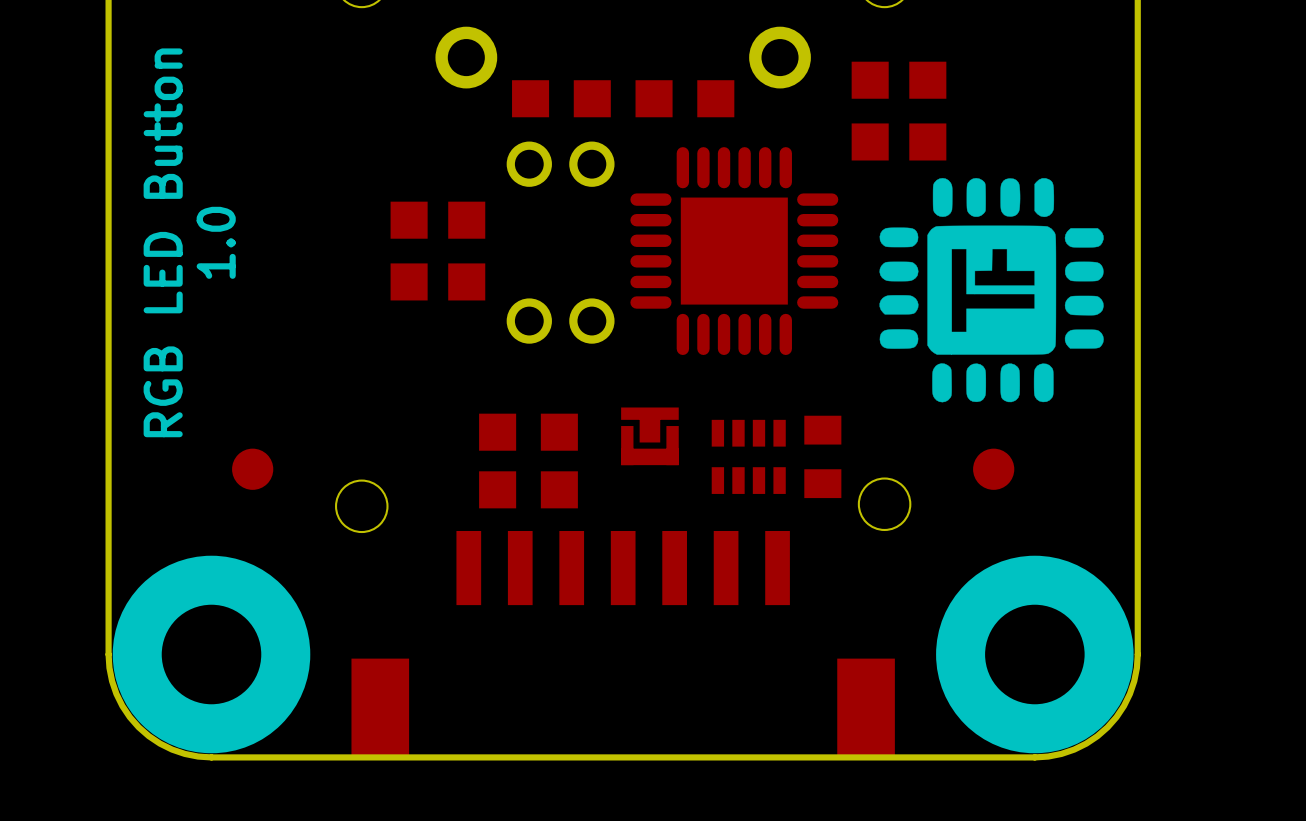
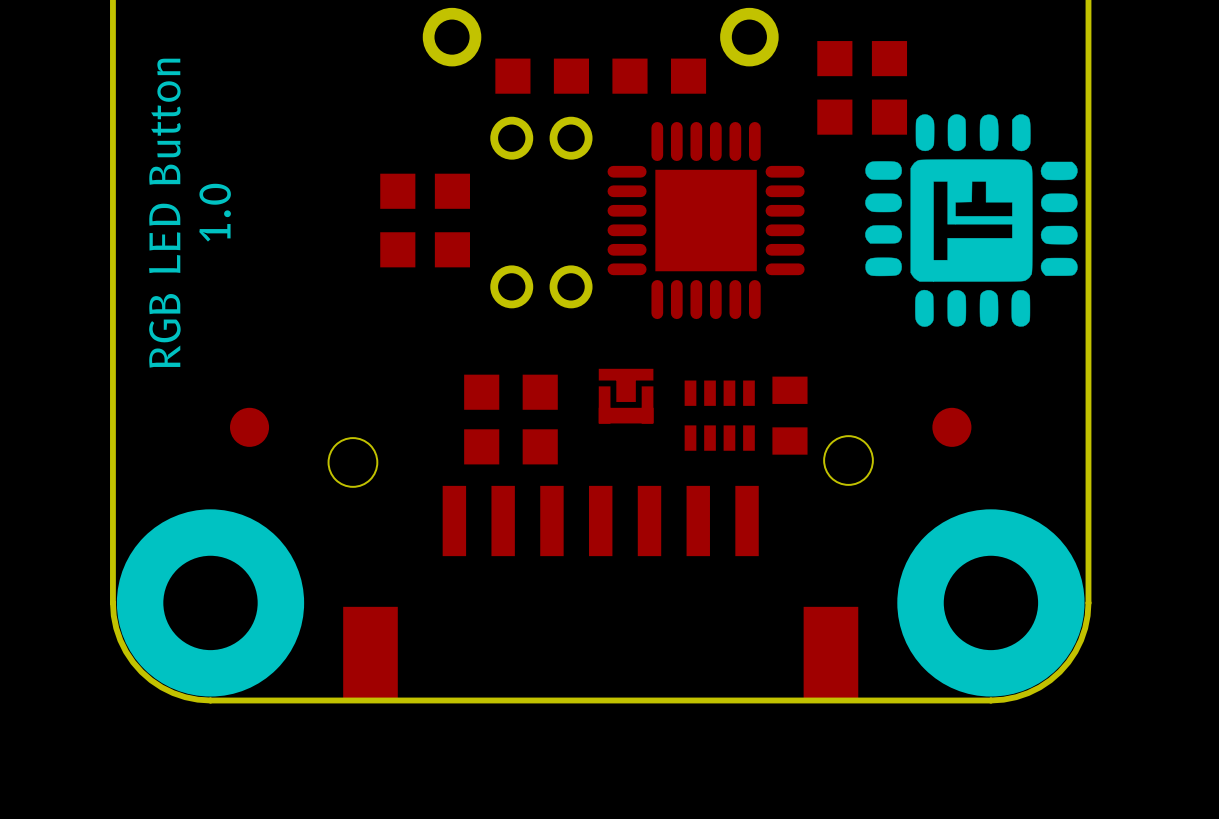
drawing position: (991, 290) -> (971, 220)

